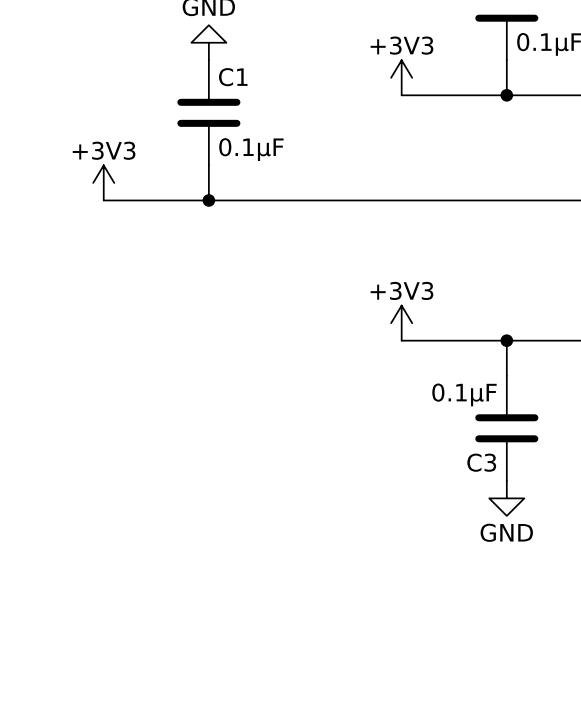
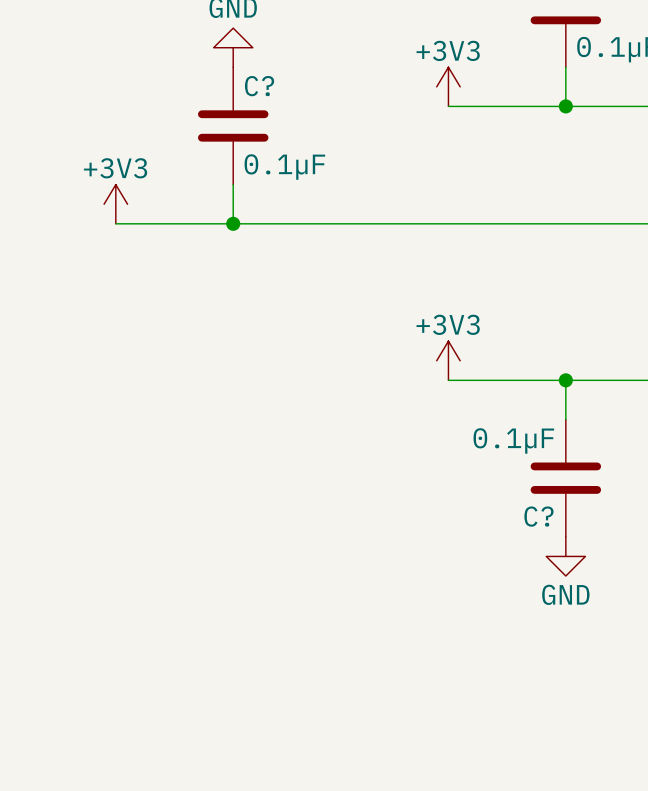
C1 name: C1 (233, 77) -> C? (259, 86)
C3 name: C3 (481, 462) -> C? (538, 516)

